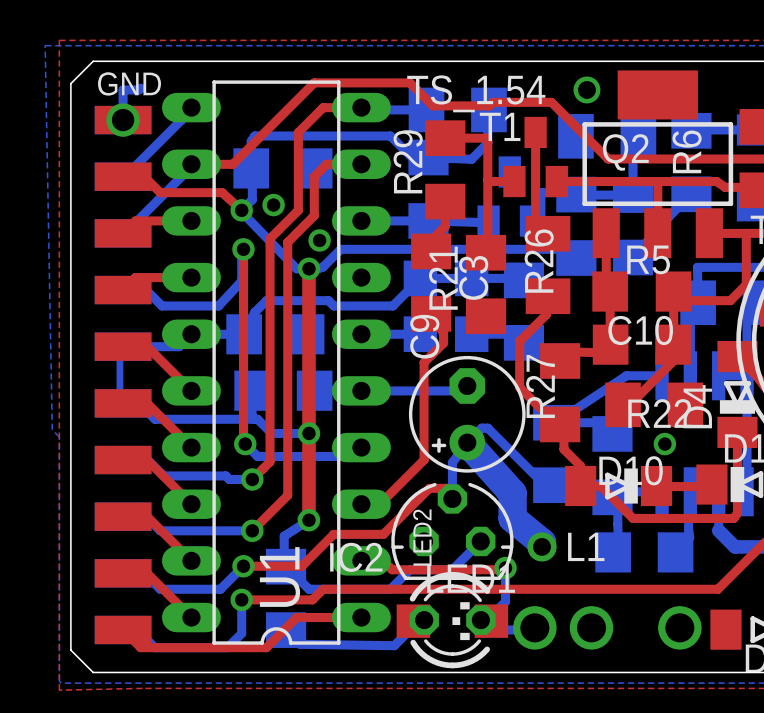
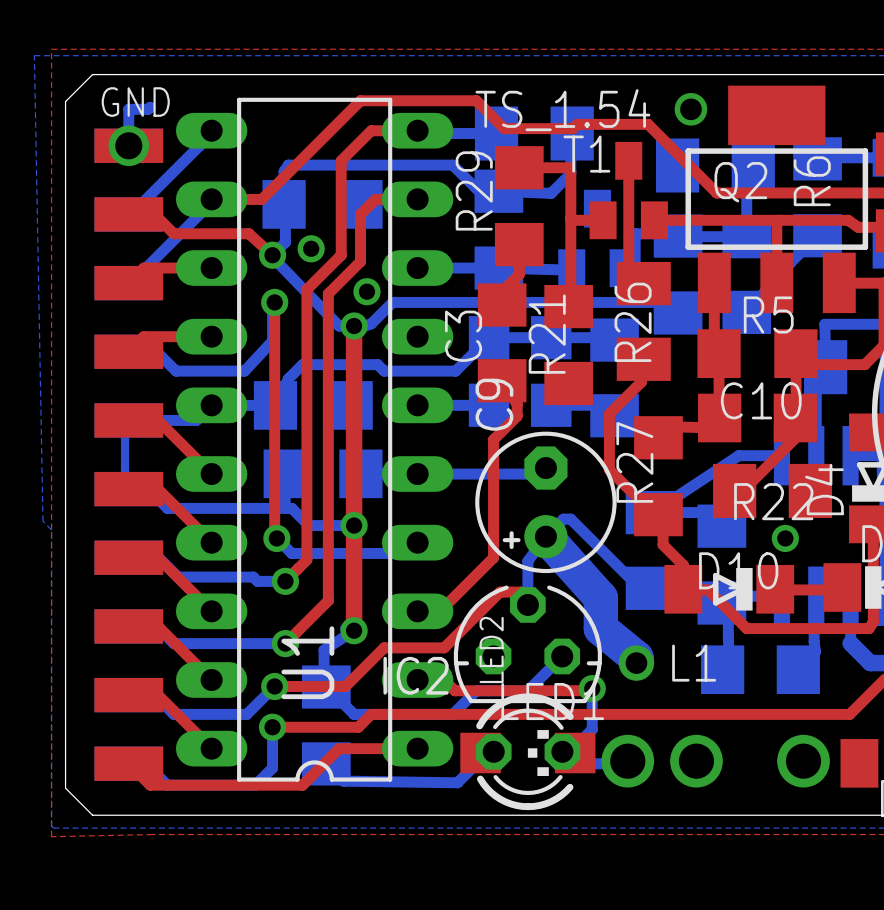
C3 name position: C3 (473, 277) -> C3 (463, 336)
R21 name position: R21 (443, 278) -> R21 (547, 334)
U1 name position: U1 (279, 577) -> U1 (307, 662)

